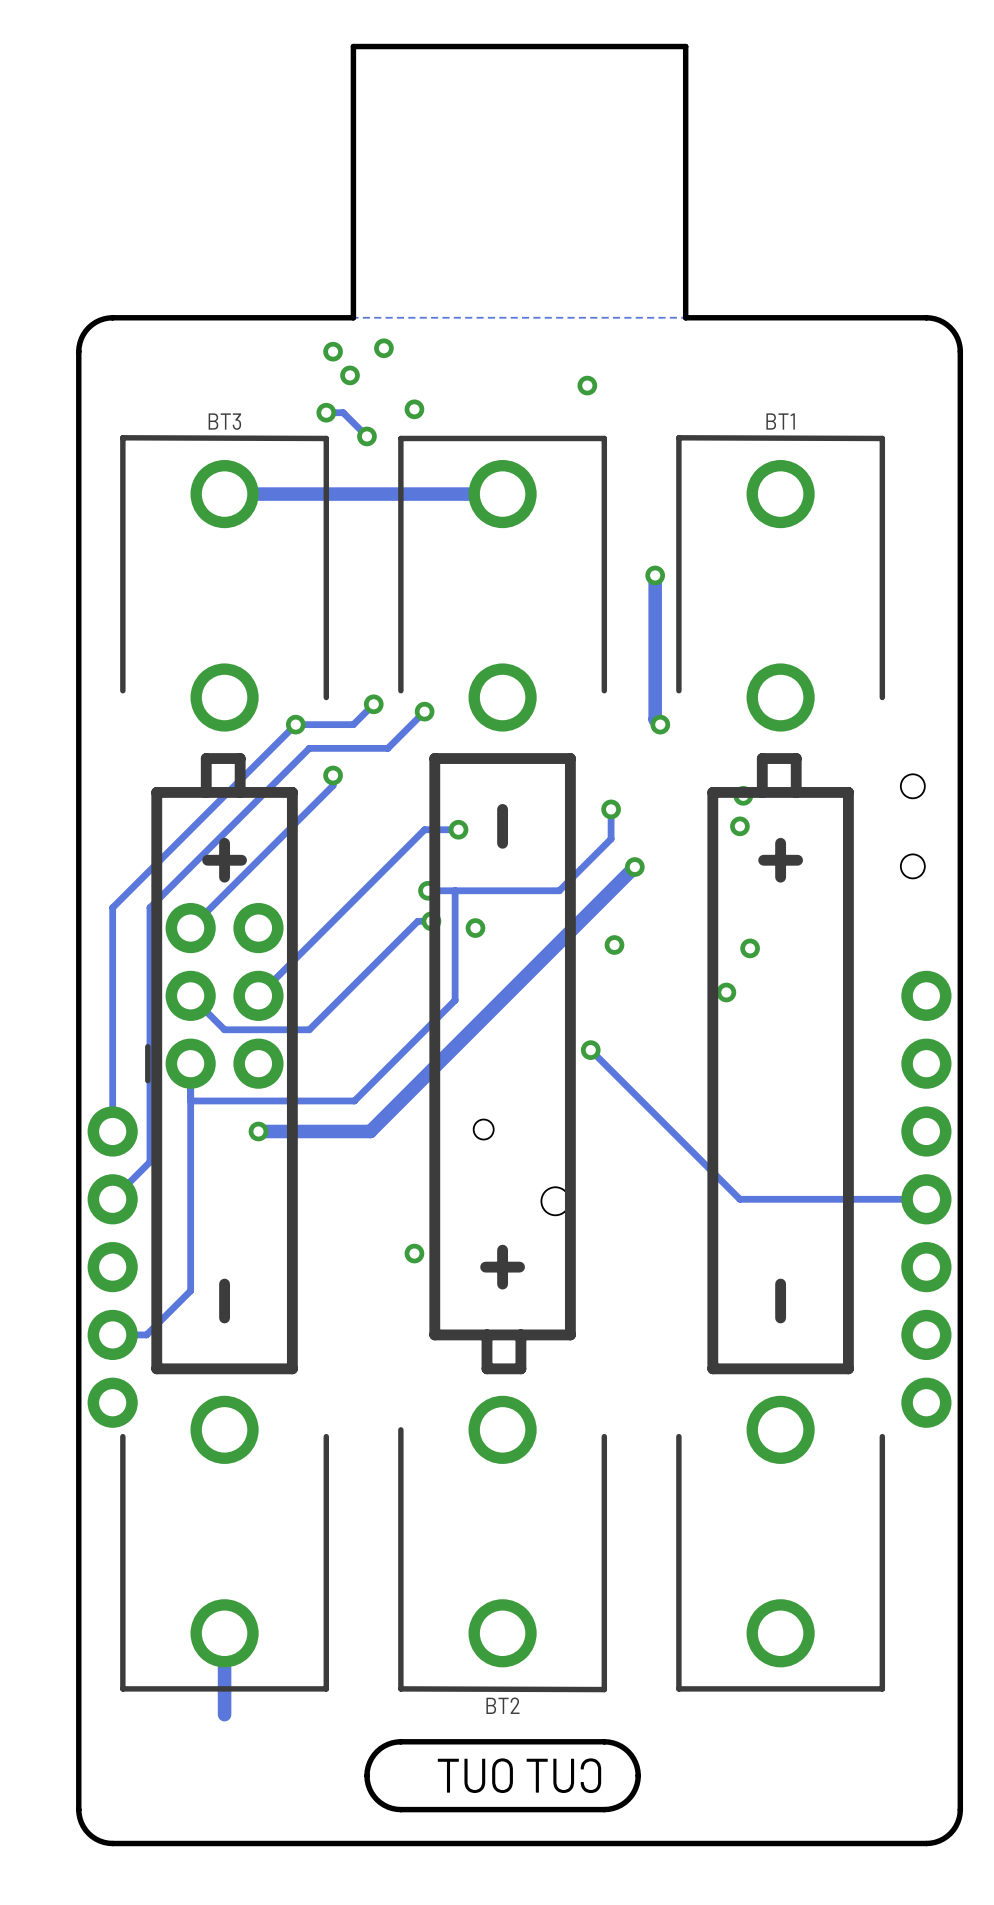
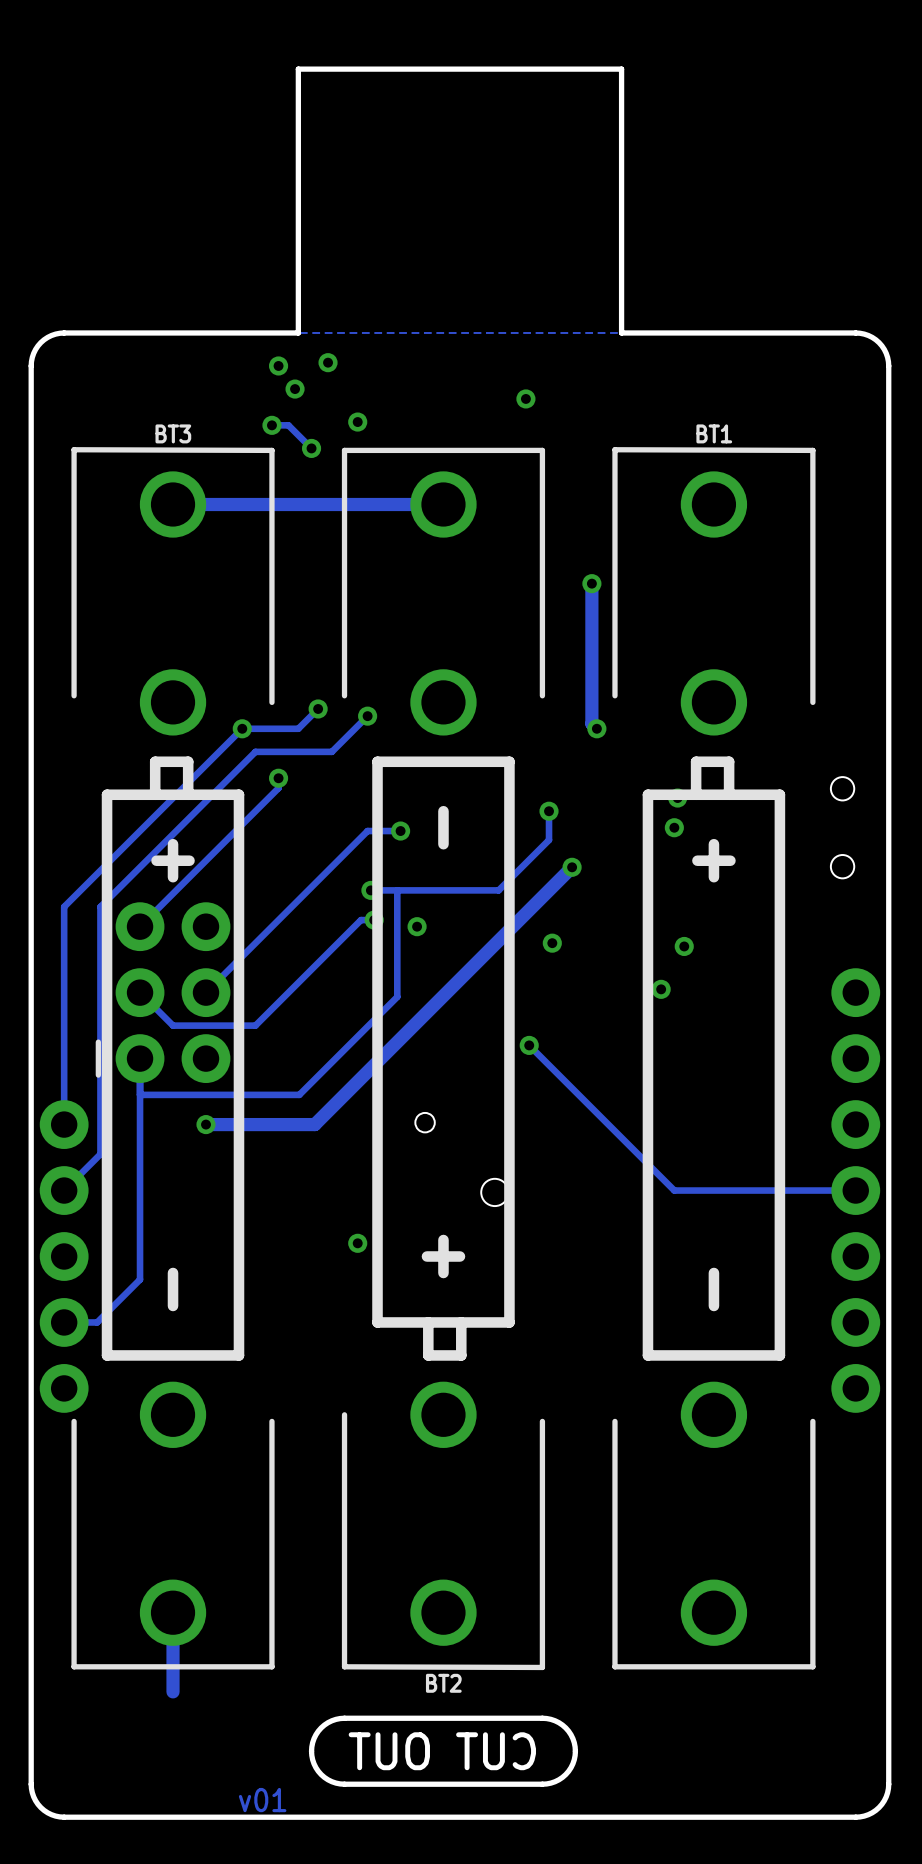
text: none -> v01 (262, 1800)

